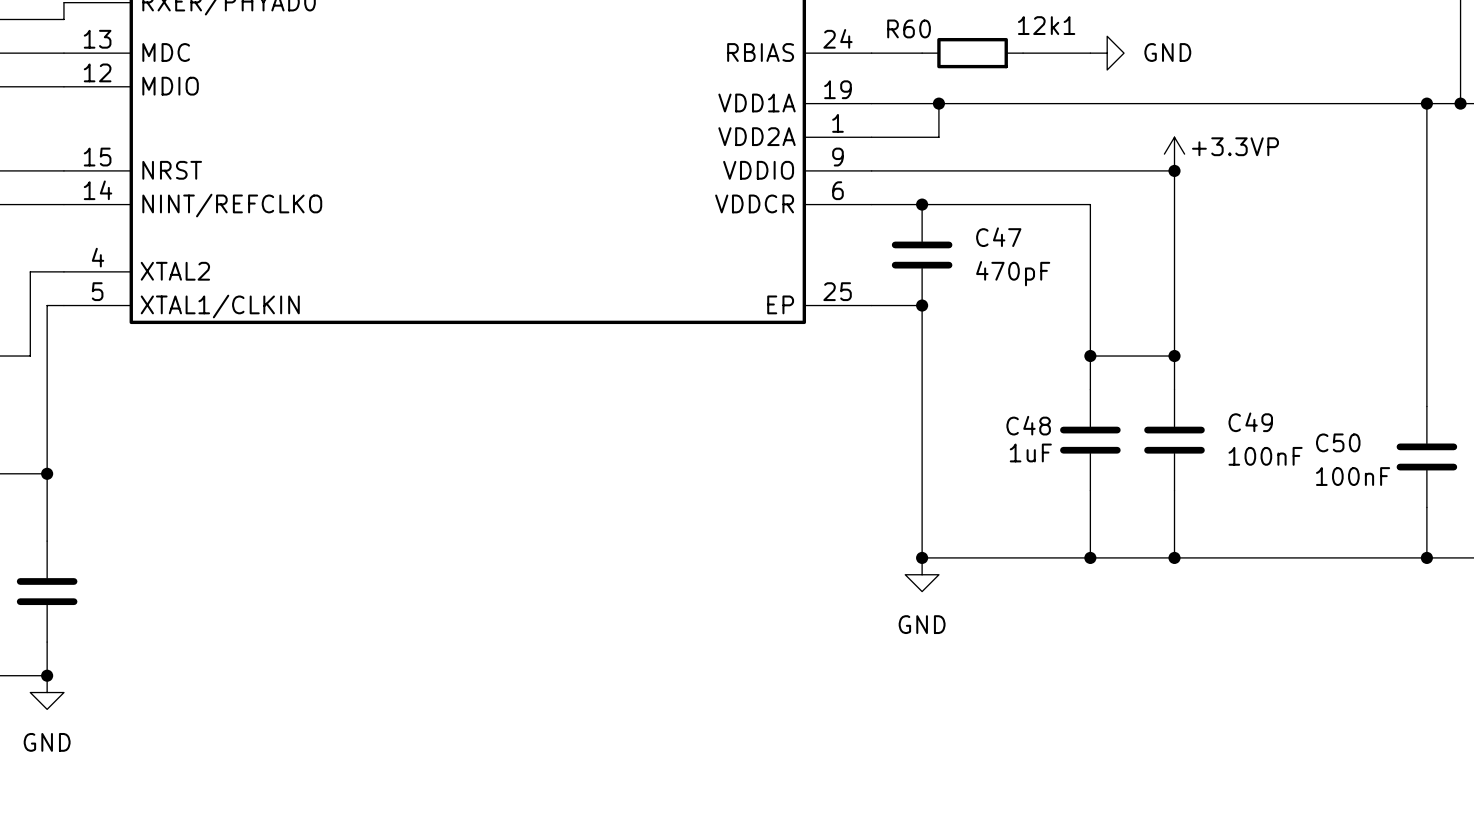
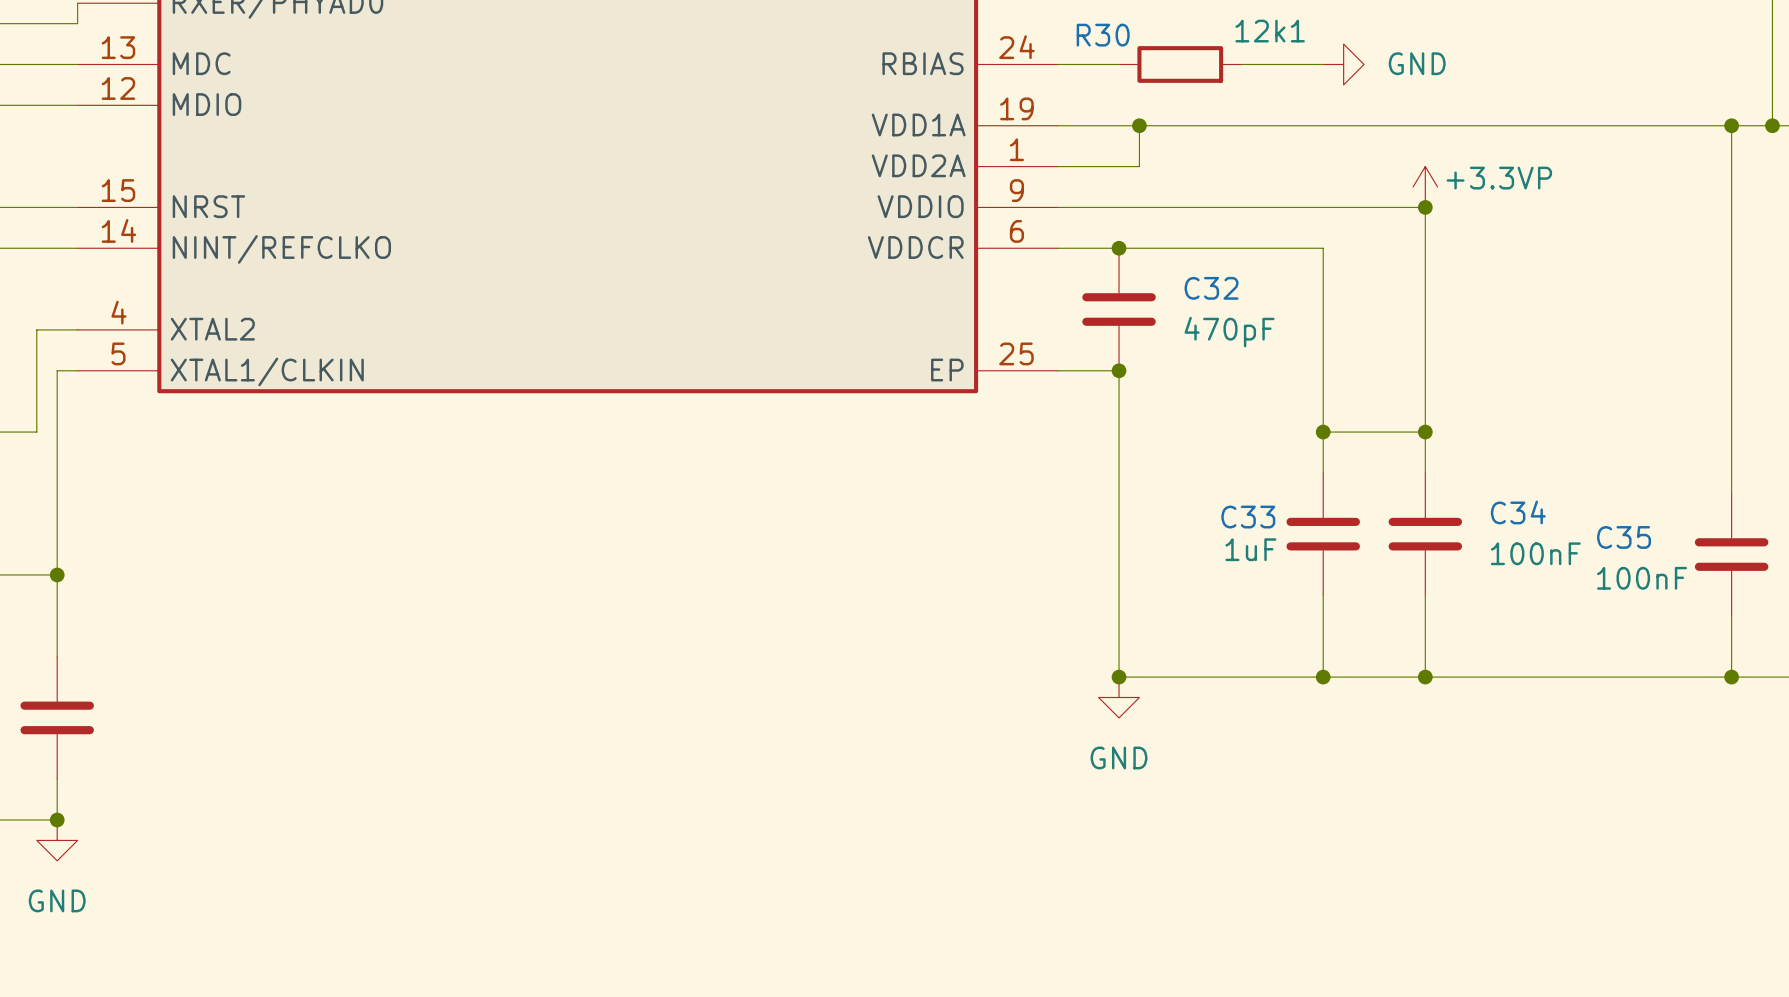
R60 name: R60 (909, 28) -> R30 (1103, 35)
C47 name: C47 (998, 237) -> C32 (1211, 288)
C49 name: C49 (1250, 422) -> C34 (1518, 512)
C48 name: C48 (1028, 425) -> C33 (1248, 517)
C50 name: C50 (1338, 442) -> C35 (1624, 537)

